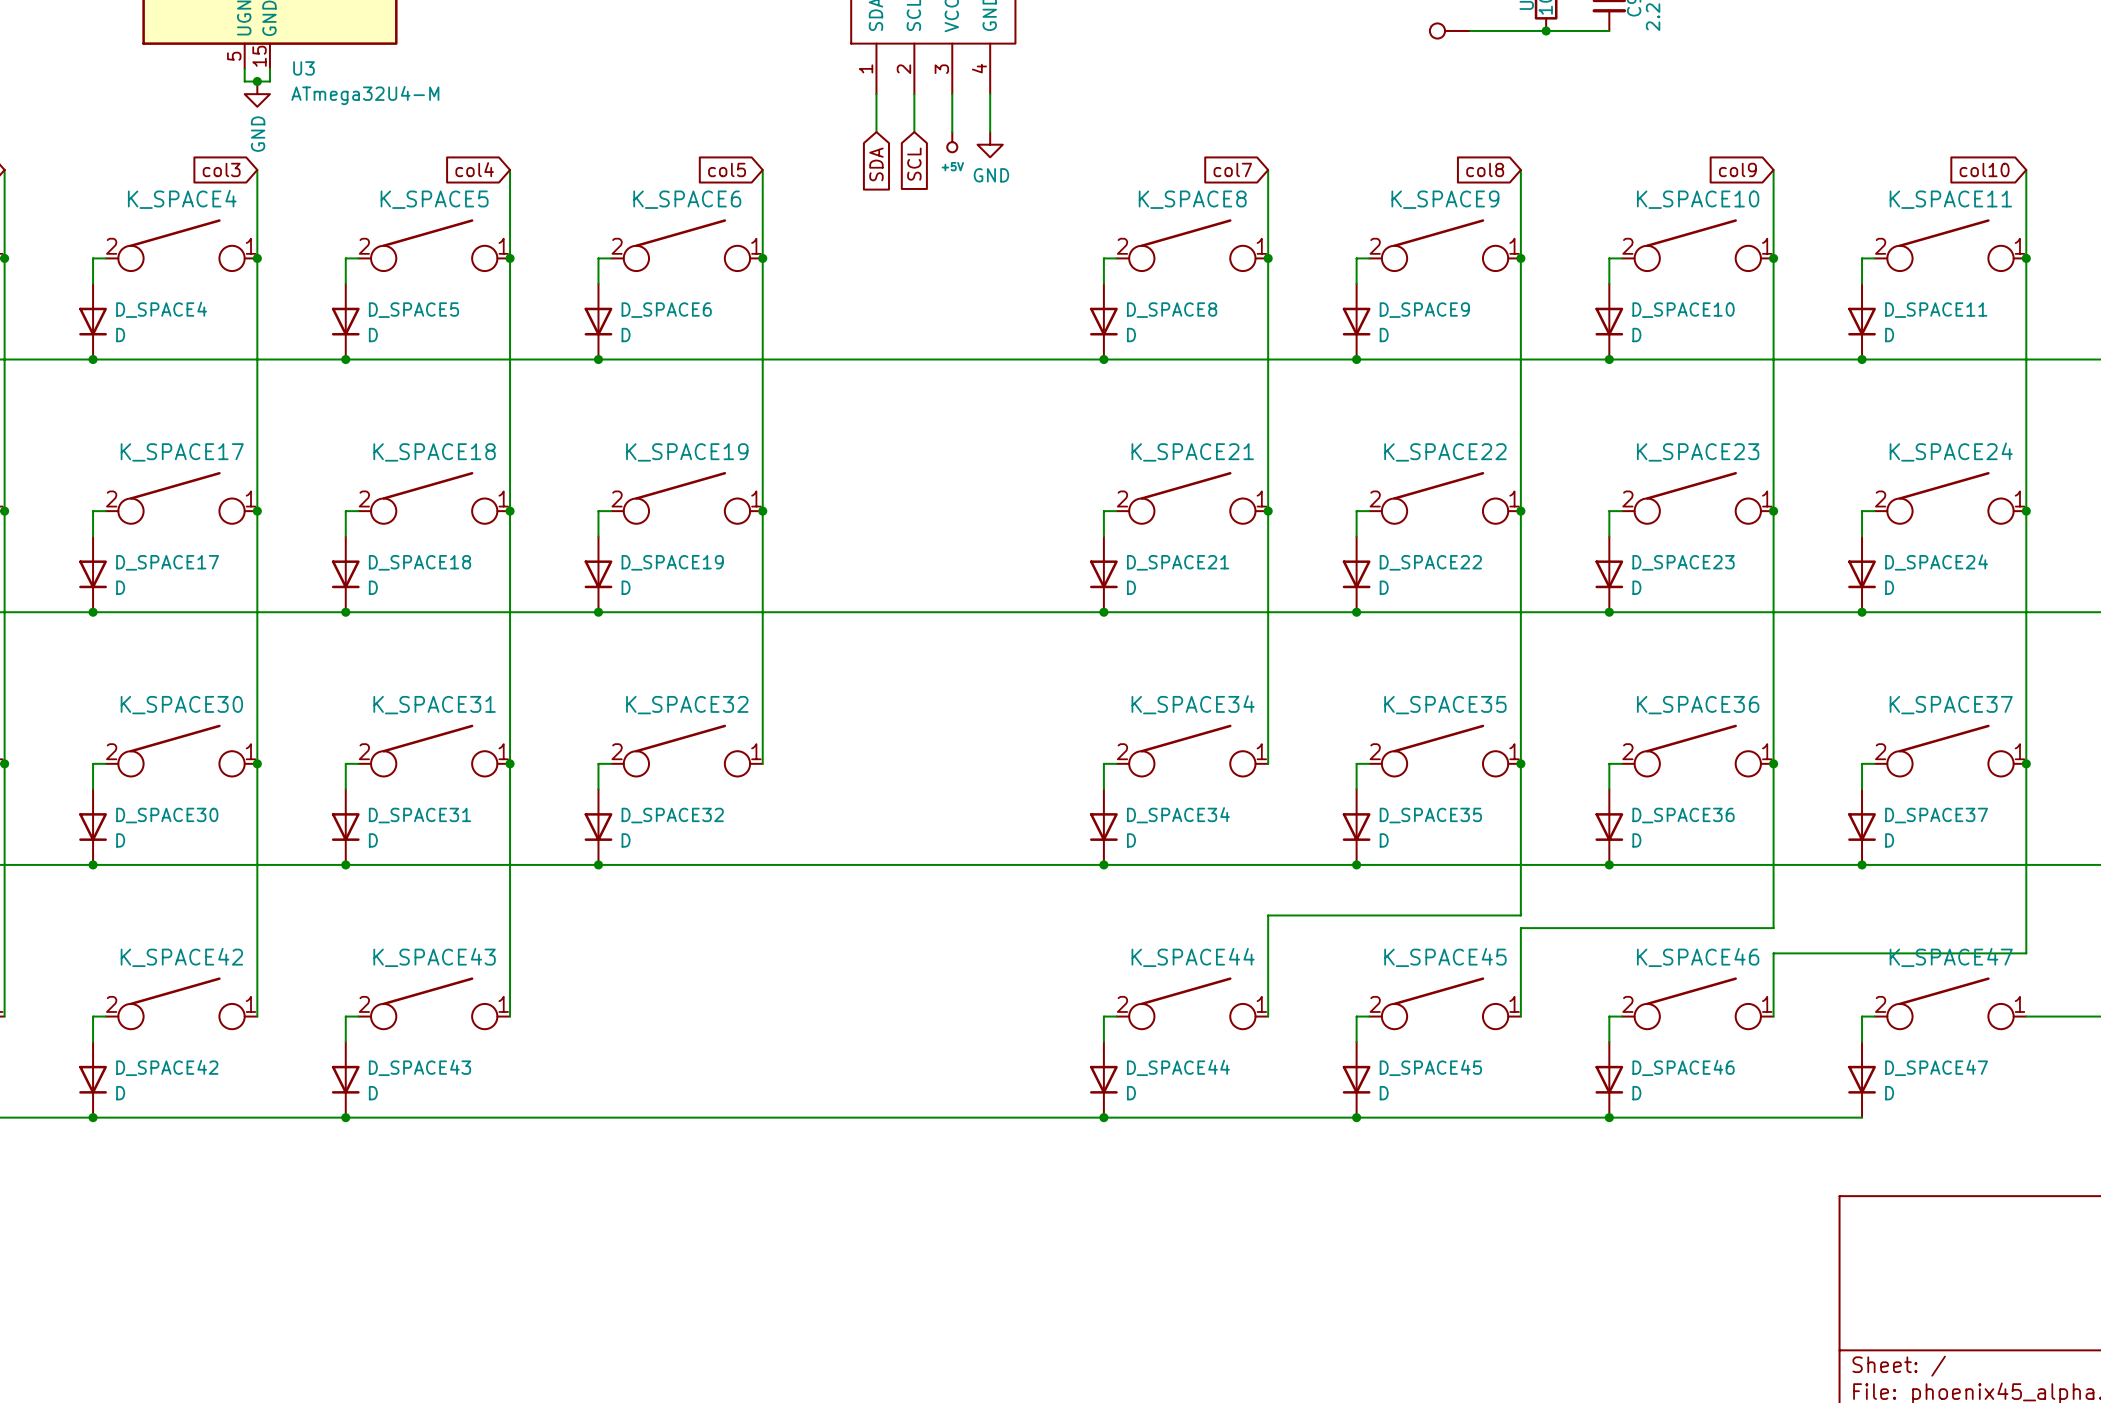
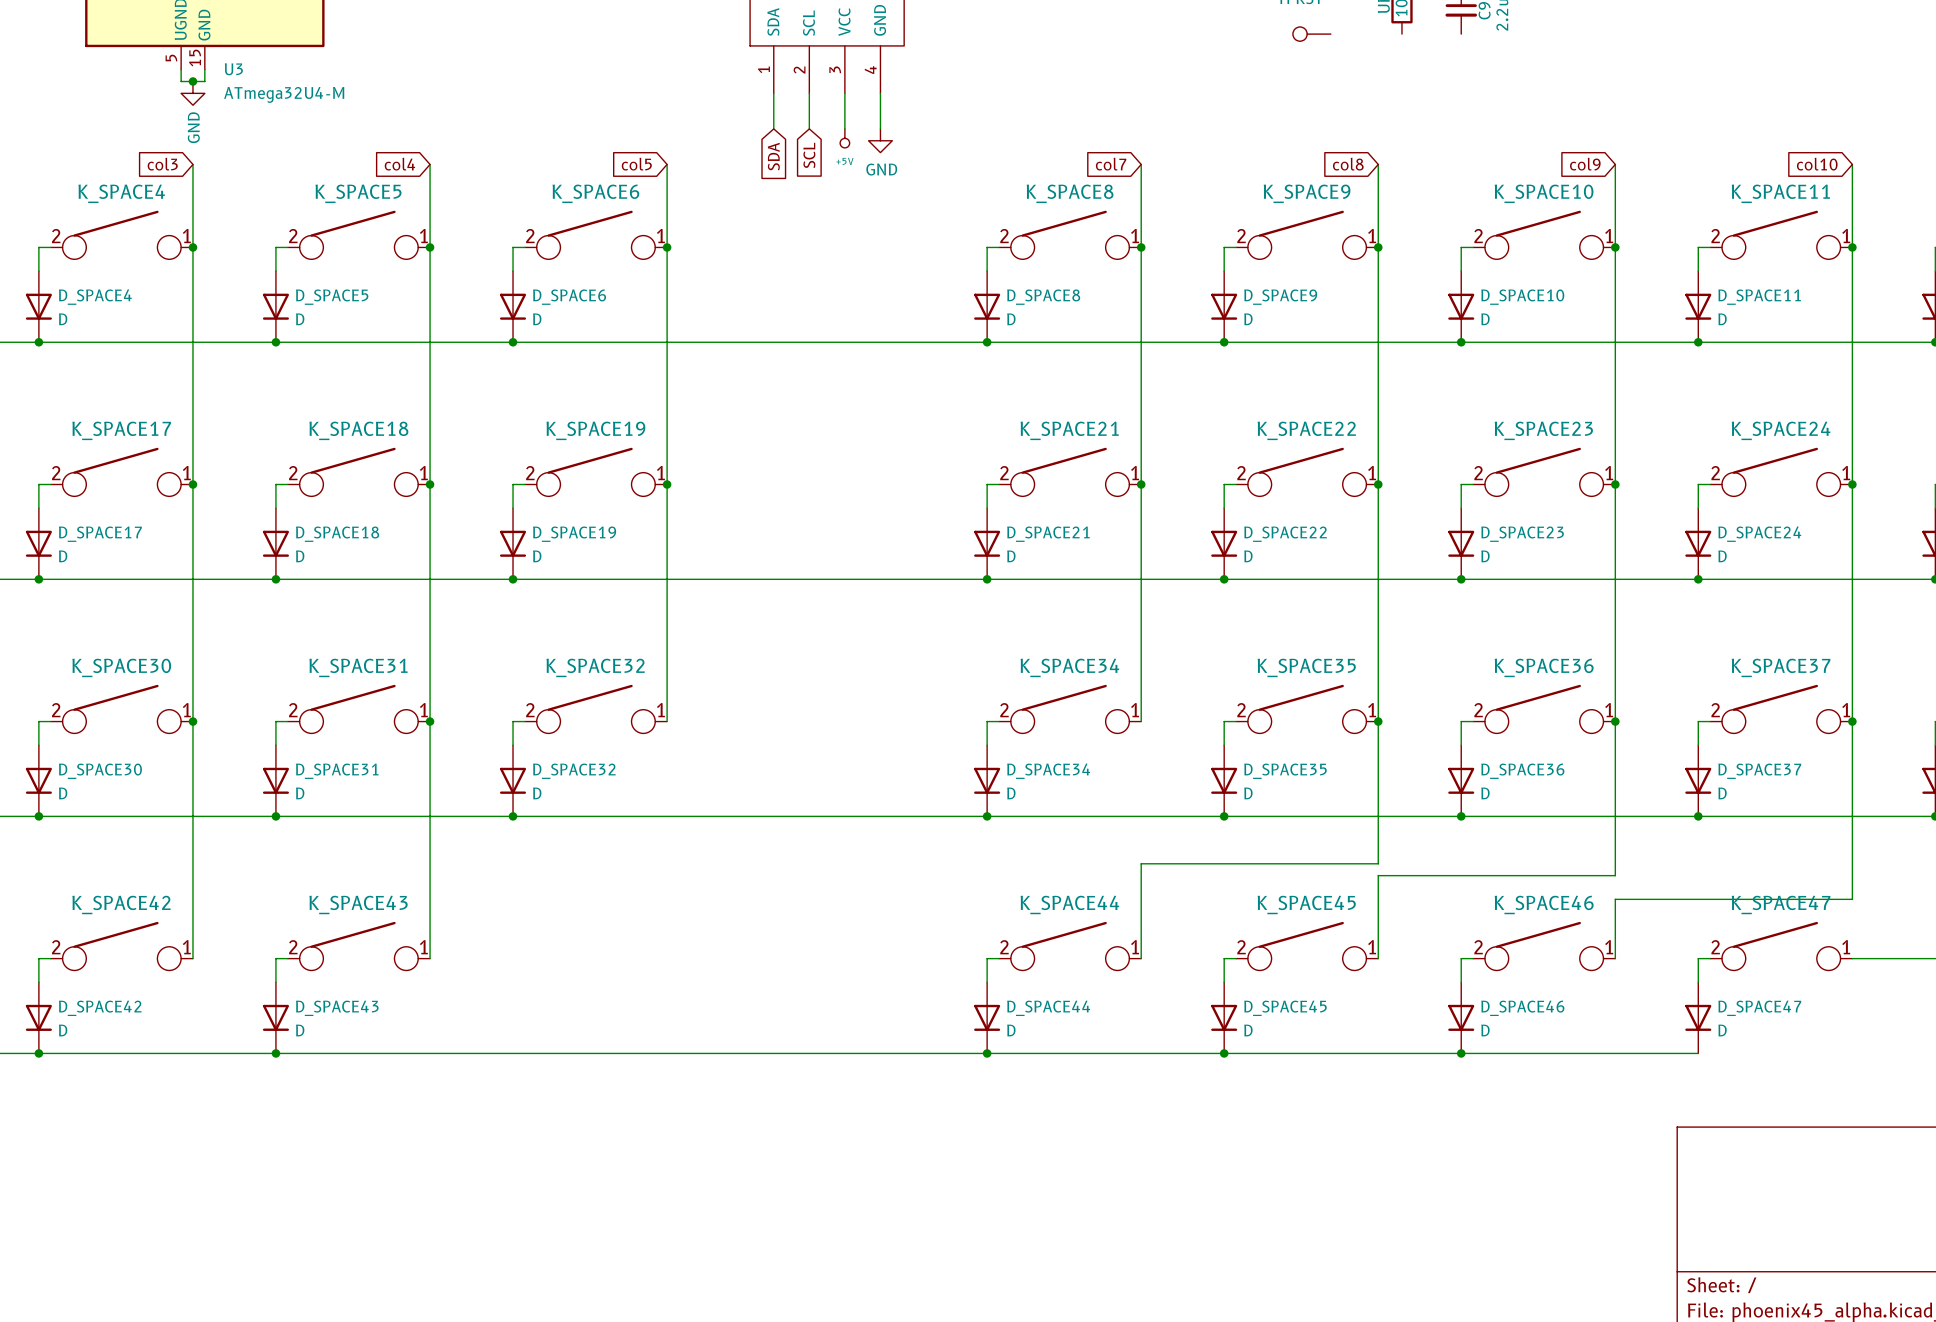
wire: (1470, 30) (1609, 30) -> none
junction: (1546, 30) -> none

